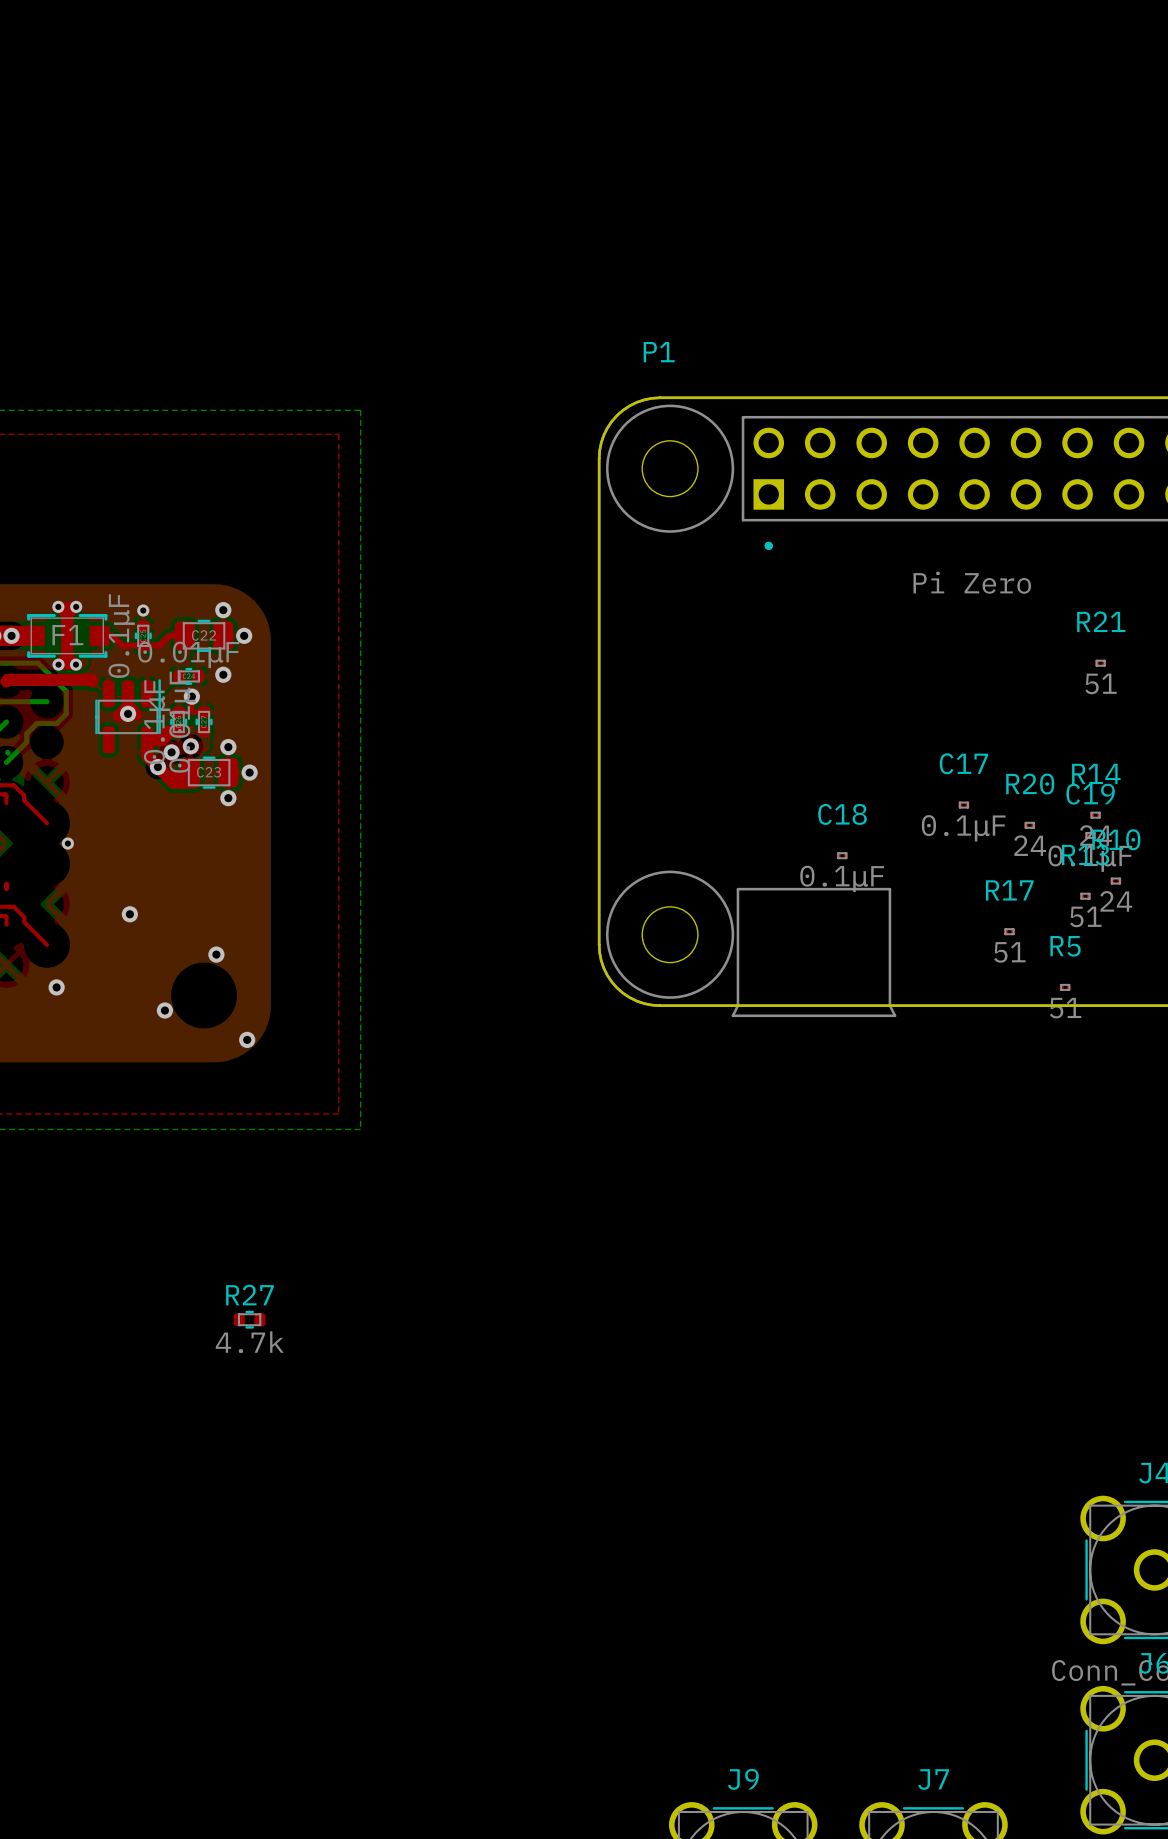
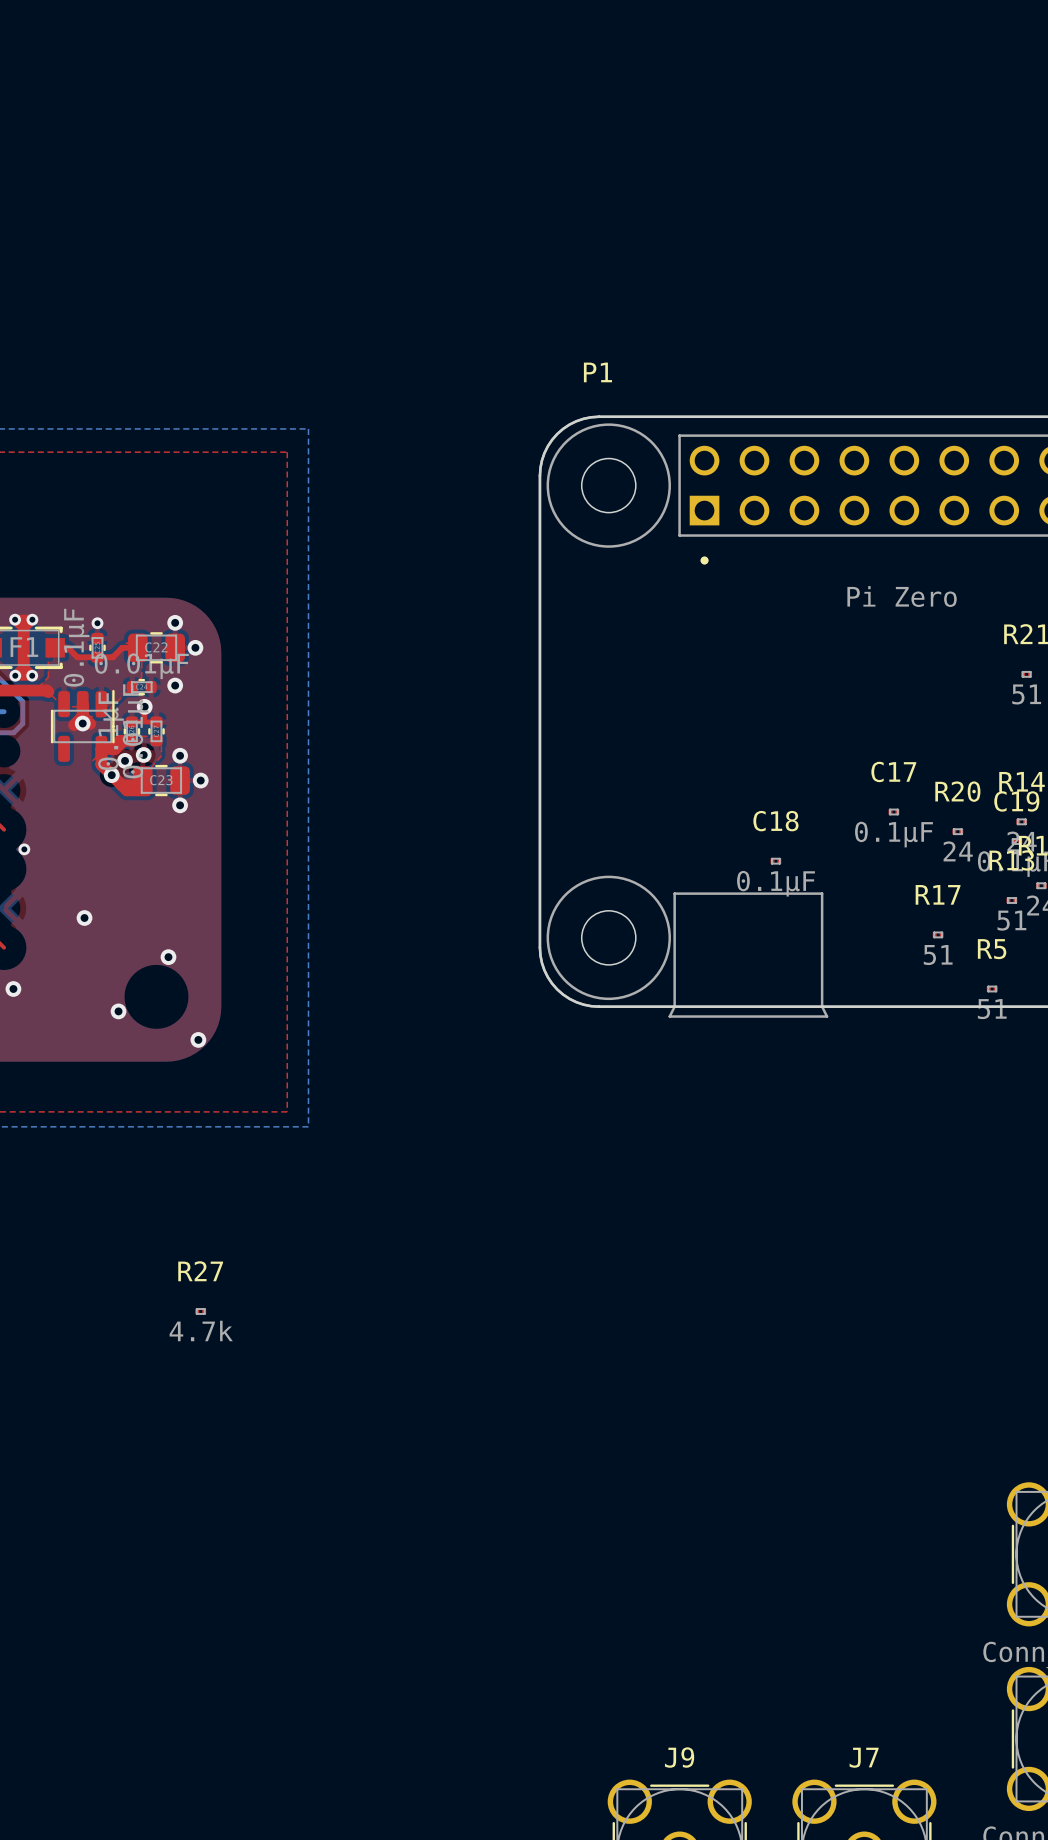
R27 footprint: [233, 1310, 266, 1329] -> [195, 1308, 207, 1315]

